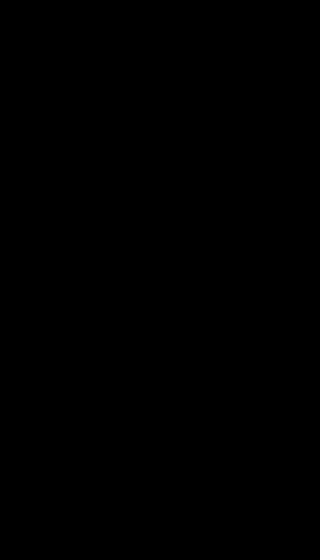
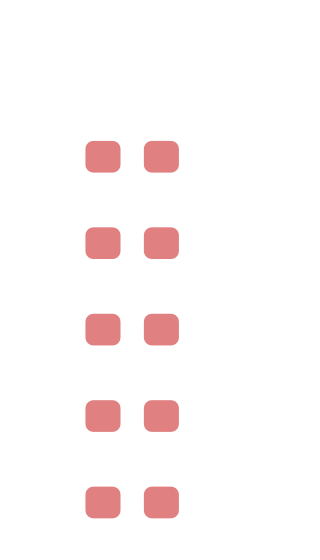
part: none -> (132, 156)
part: none -> (132, 243)
part: none -> (132, 329)
part: none -> (132, 416)
part: none -> (132, 502)

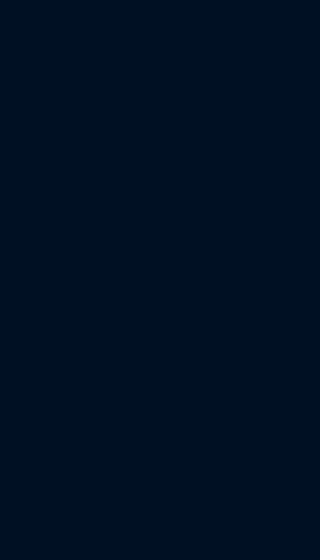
part: (132, 156) -> none
part: (132, 243) -> none
part: (132, 329) -> none
part: (132, 416) -> none
part: (132, 502) -> none

